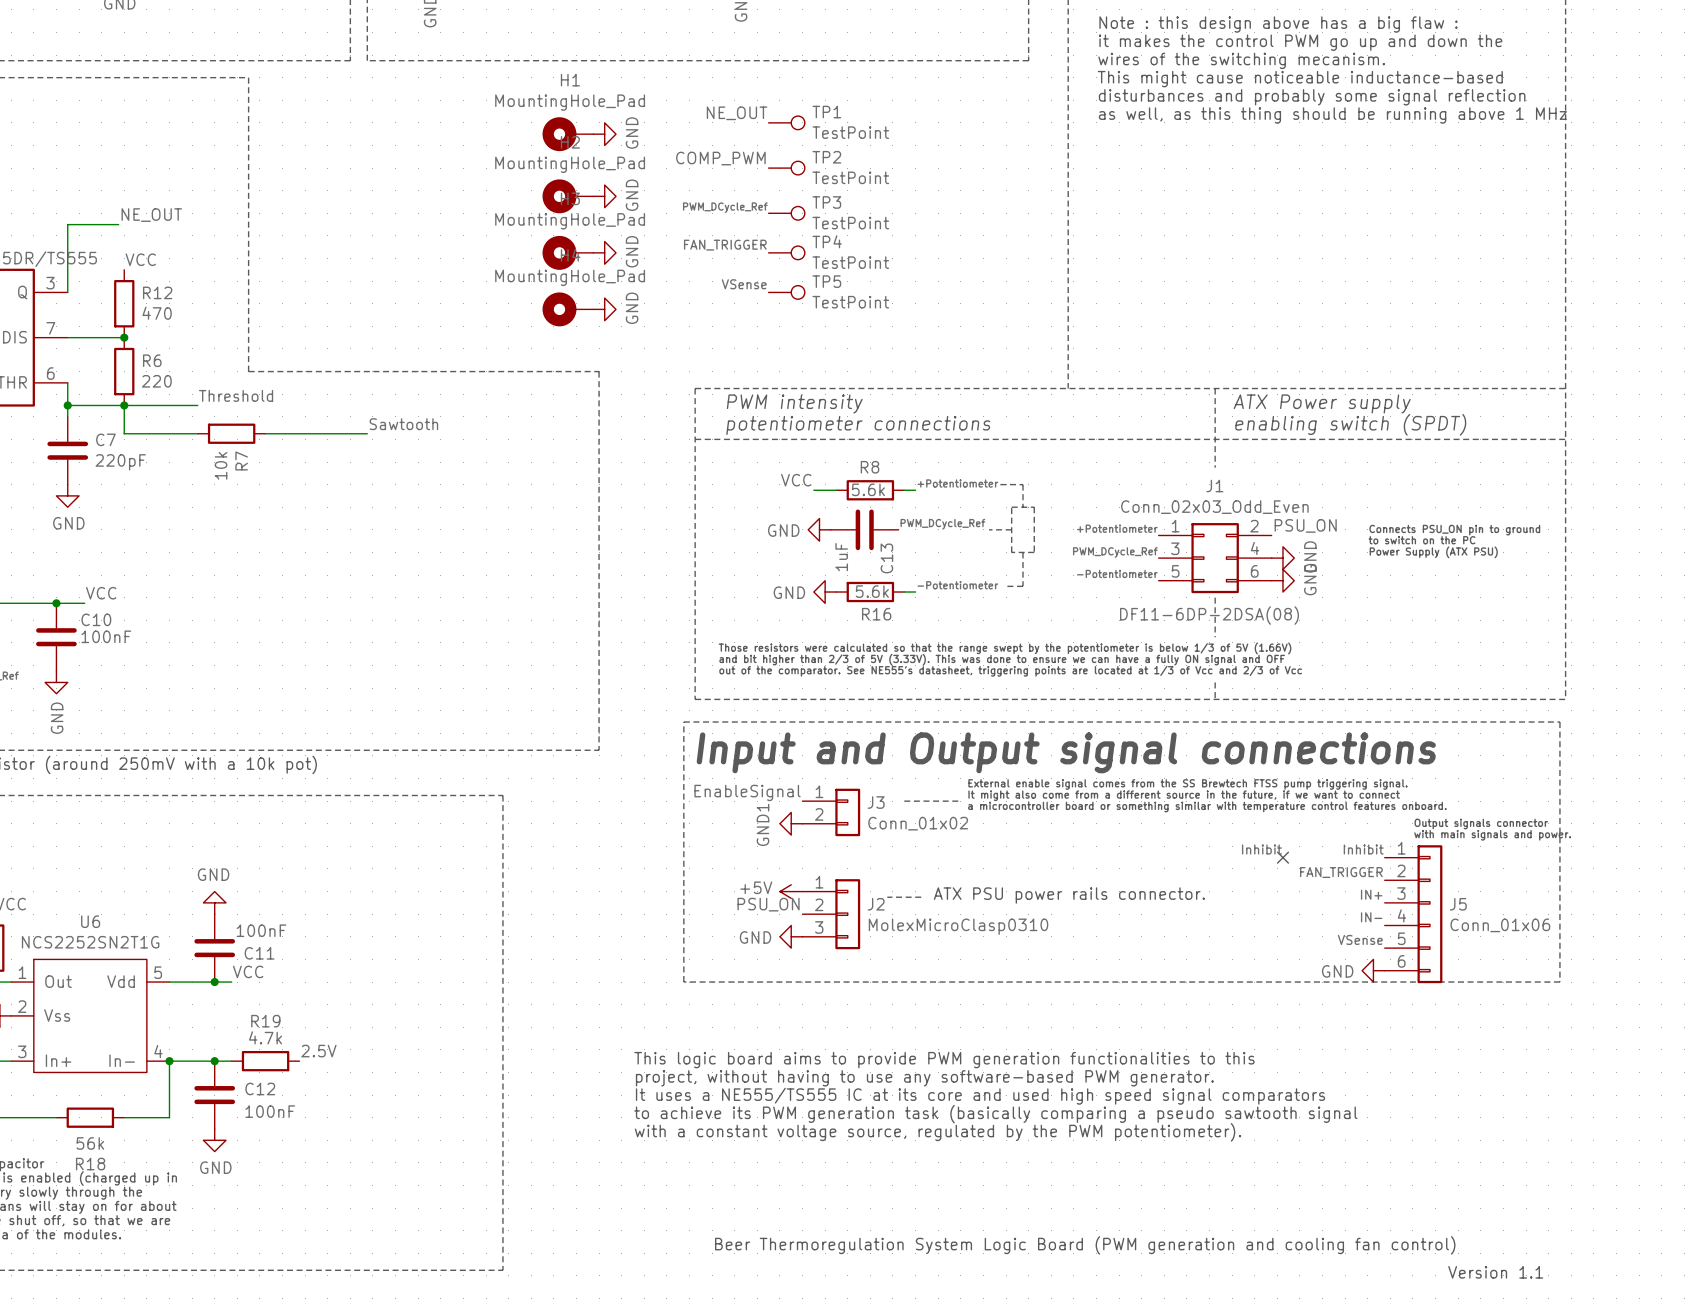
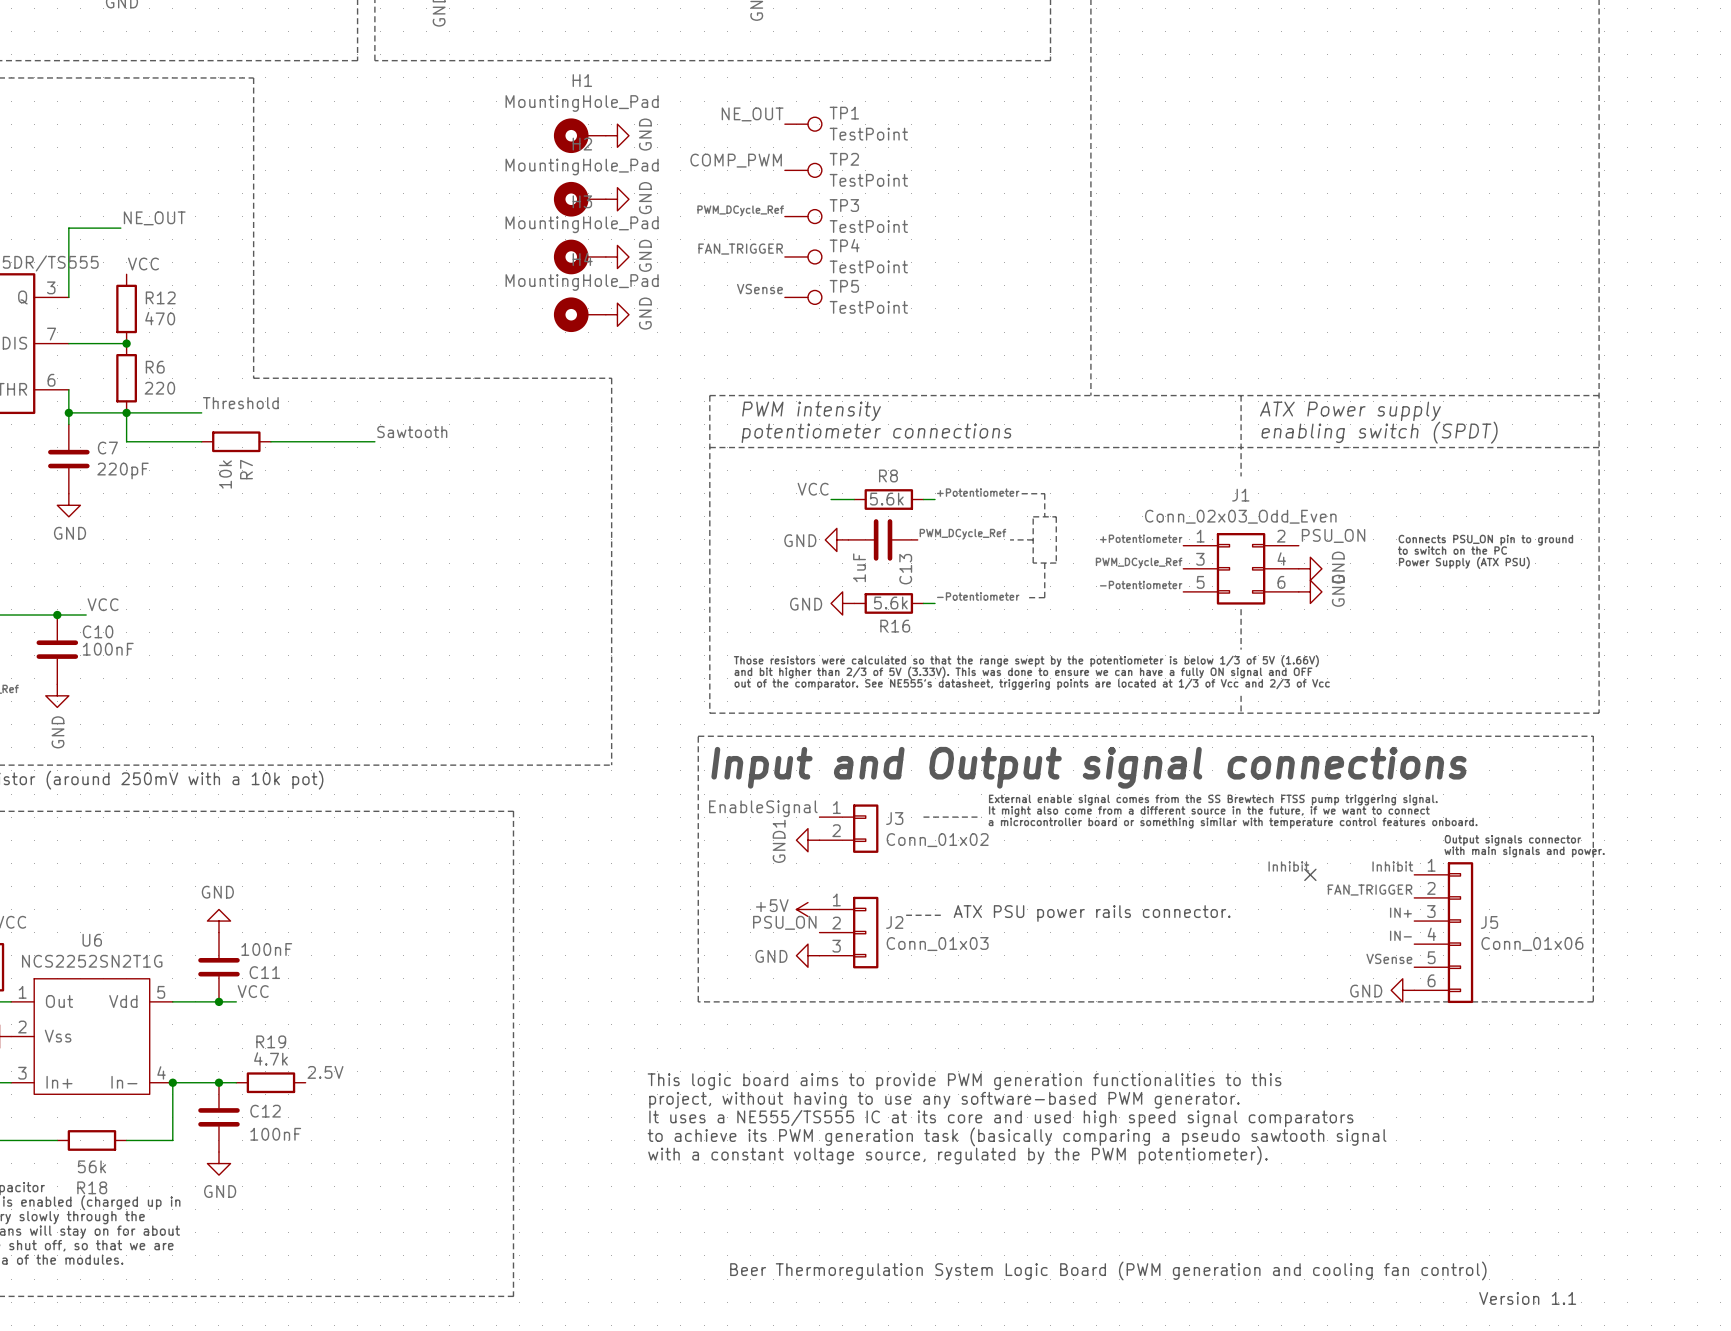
text: Note : this design above has a big flaw : (1278, 24) -> none
text: it makes the control PWM go up and down the (1300, 42) -> none
text: wires of the switching mecanism. (1241, 60) -> none
text: This might cause noticeable inductance-based (1300, 79) -> none
text: disturbances and probably some signal reflection (1312, 97) -> none
text: as well, as this thing should be running above 1 MHz (1332, 115) -> none
J1 text: DF11-6DP-2DSA(08) (1209, 615) -> none
J2 value: MolexMicroClasp0310 (958, 926) -> Conn_01x03 (937, 944)

